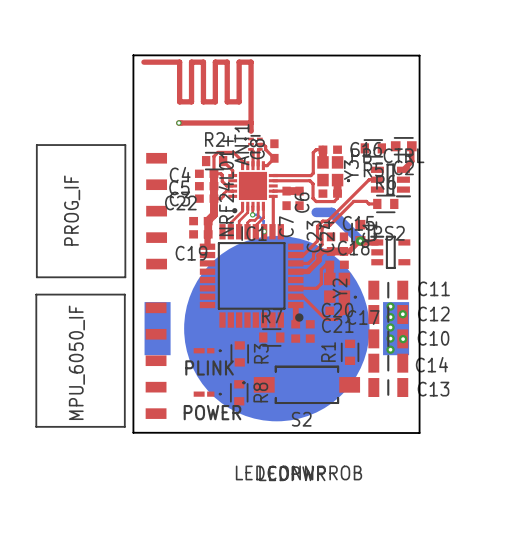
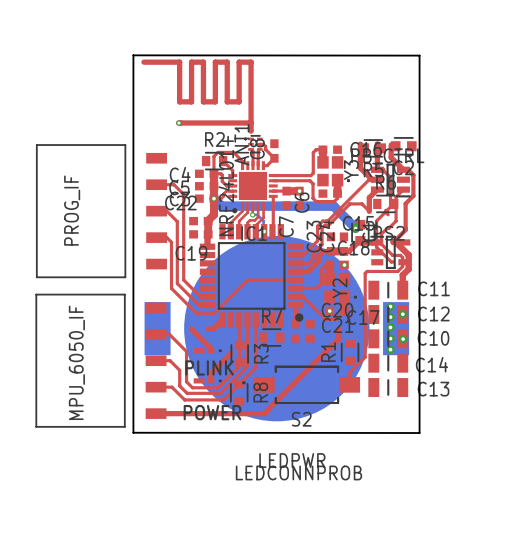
top track: none -> (360, 144) (360, 168) (372, 179) (377, 179)
top track: none -> (377, 144) (377, 169) (382, 169) (390, 177) (390, 207) (376, 221) (376, 247) (393, 261)
top track: none -> (391, 144) (391, 157) (403, 169) (408, 169) (413, 175) (413, 195) (405, 203) (405, 230) (393, 242) (395, 241) (408, 255) (408, 269) (402, 275) (402, 290)
top track: (411, 146) (411, 161) (403, 169) -> none
top track: none -> (156, 184) (173, 184) (183, 194) (183, 279) (200, 296) (207, 296)
top track: none -> (403, 189) (396, 196) (396, 221) (381, 234) (381, 244) (392, 255) (400, 255) (402, 257) (402, 266) (397, 271) (367, 271) (365, 273) (365, 357) (349, 372) (349, 384)
via: none -> (299, 191)
bottom track: none -> (213, 198) (221, 206) (333, 206) (355, 228)
via: none -> (213, 198)
top track: (377, 203) (353, 201) (328, 225) -> (377, 189) (369, 197) (369, 211) (361, 203) (349, 203) (328, 225)
top track: none -> (156, 211) (166, 211) (177, 221) (177, 283) (198, 305) (207, 305)
bottom track: (316, 212) (331, 212) (360, 240) -> none
top track: none -> (387, 213) (388, 214)
top track: none -> (156, 237) (166, 237) (171, 242) (171, 288) (196, 313) (213, 313) (247, 280) (295, 280)
via position: (360, 240) -> (355, 228)
via: none -> (344, 265)
via: none -> (329, 311)
top track: none -> (222, 320) (213, 329) (208, 329)
top track: none -> (239, 320) (239, 365) (217, 387) (192, 387) (186, 381) (186, 351) (169, 334) (156, 334)
top track: none -> (247, 320) (247, 366) (220, 393) (187, 393) (179, 385) (179, 370) (170, 360) (156, 360)
top track: none -> (255, 320) (255, 367) (223, 399) (184, 399) (171, 387) (156, 387)
top track: none -> (338, 328) (338, 339) (263, 413) (156, 413)
top track: none -> (191, 329) (210, 350)
top track: none -> (230, 353) (210, 373) (210, 380)
LEDPWR position: (207, 394) -> (207, 380)

